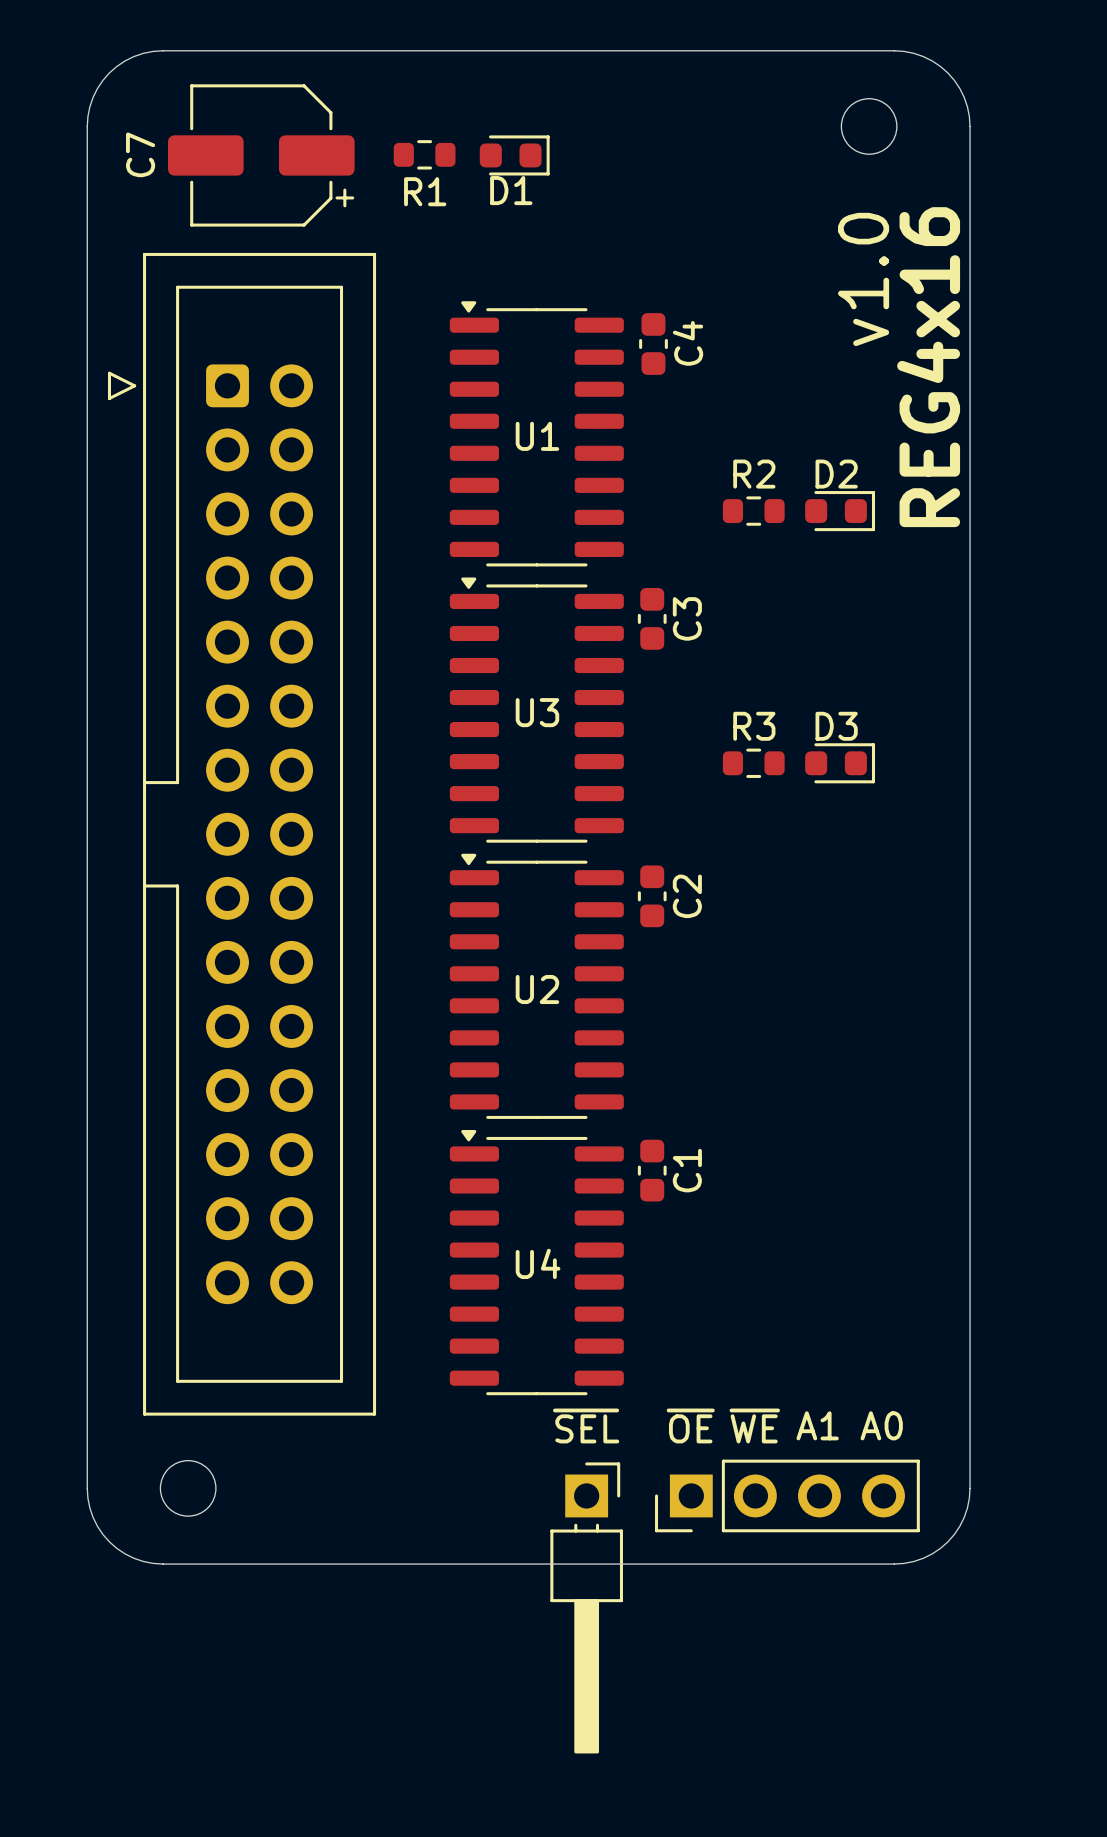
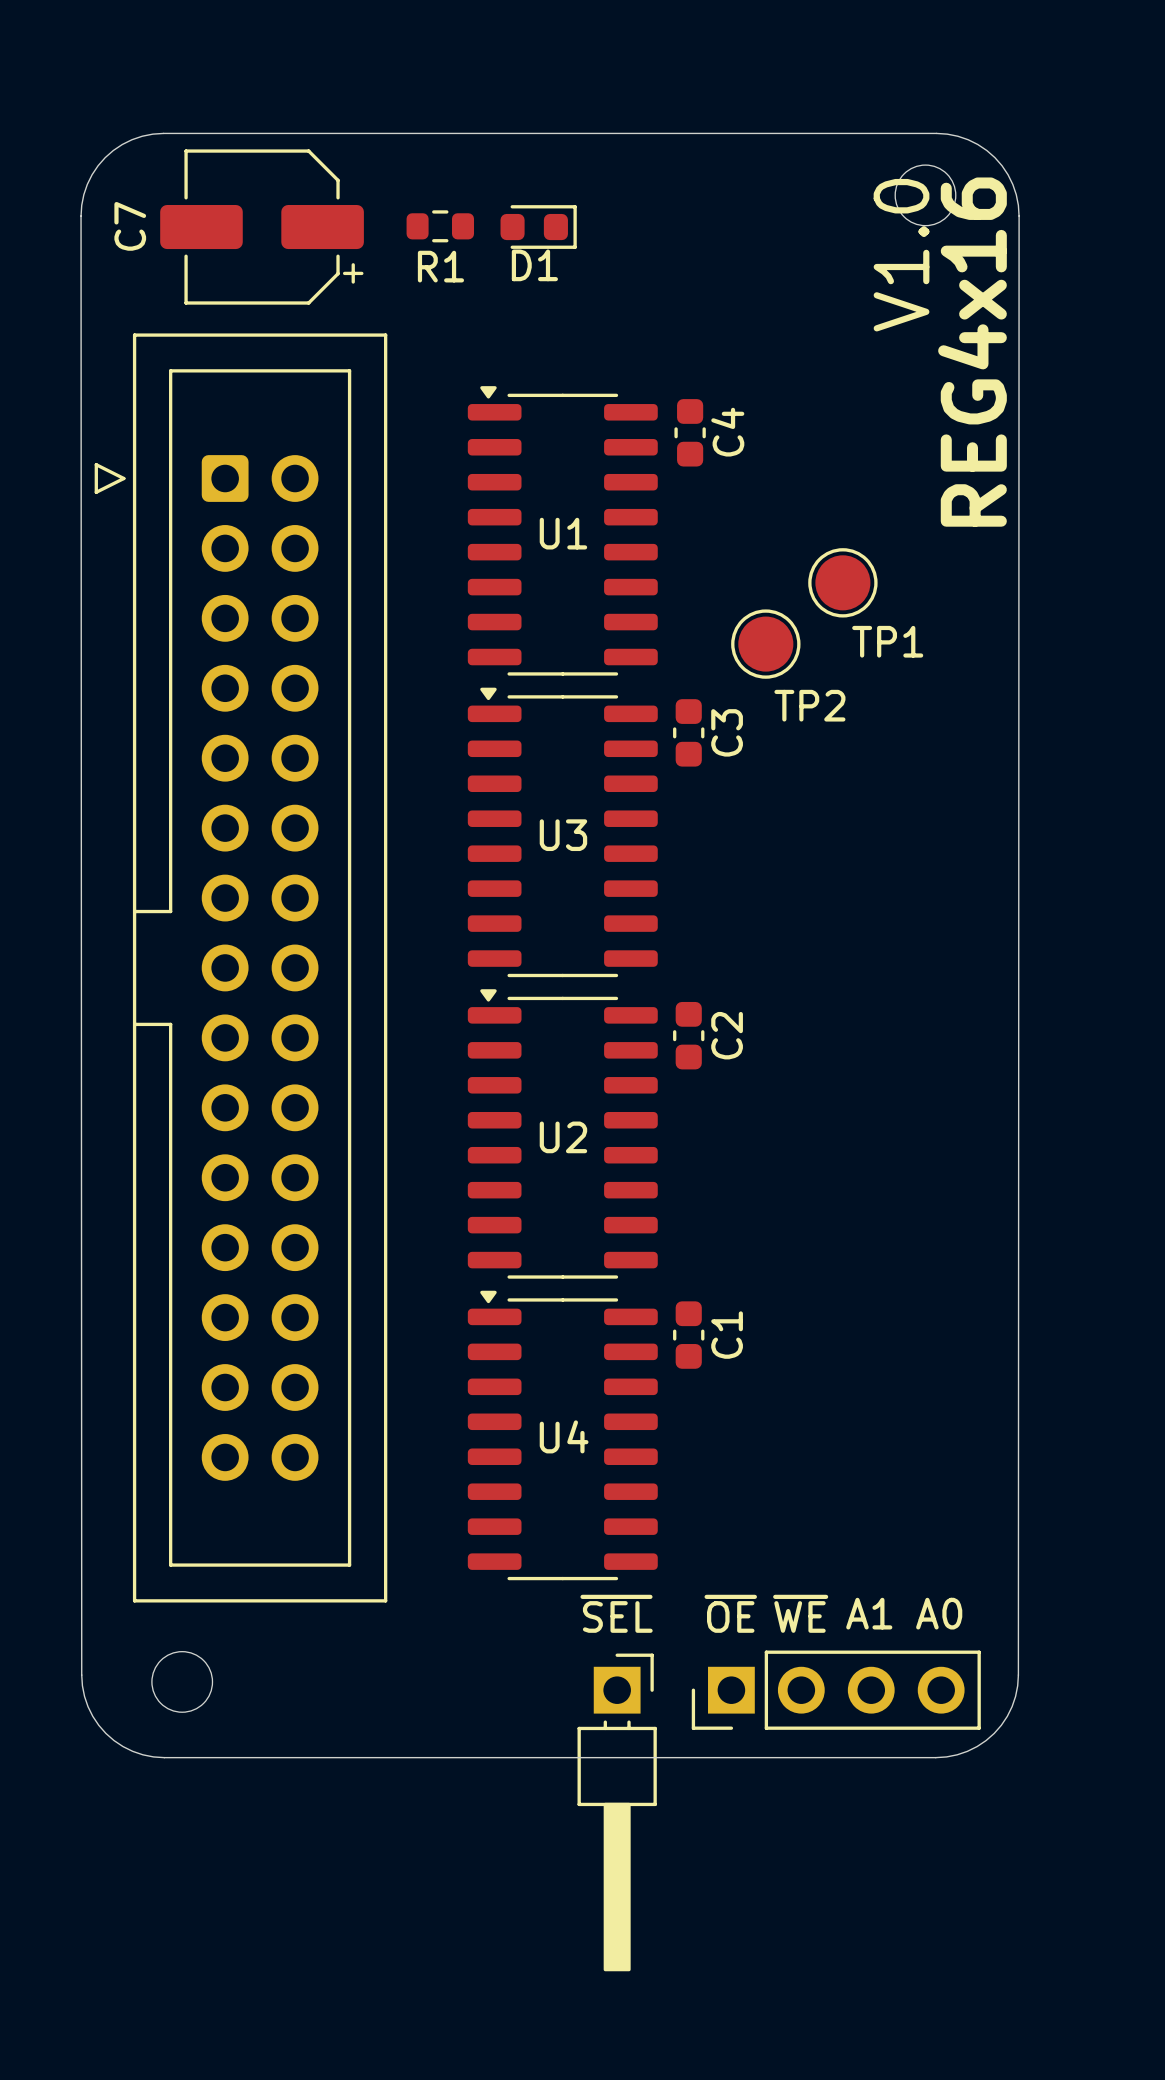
board edge: (162, 50) (894, 50) (913, 53) (932, 60) (947, 72) (959, 88) (967, 106) (970, 126) (970, 1488) (967, 1507) (959, 1526) (947, 1541) (932, 1553) (913, 1561) (894, 1564) (162, 1564) (143, 1561) (125, 1553) (109, 1541) (97, 1526) (89, 1507) (87, 1488) (87, 126) (93, 97) (109, 72) (133, 56) (162, 50) -> (163, 133) (132, 139) (105, 157) (87, 184) (81, 216) (81, 1675) (84, 1696) (92, 1716) (105, 1733) (123, 1746) (142, 1754) (164, 1757) (935, 1757) (957, 1754) (977, 1746) (994, 1733) (1007, 1716) (1015, 1696) (1018, 1675) (1019, 216) (1016, 194) (1008, 174) (994, 157) (977, 144) (957, 136) (936, 133) (163, 133)
text: v1.0 (863, 279) -> V1.0 (901, 255)
text position: REG4x16 (928, 367) -> REG4x16 (972, 352)
TP1: none -> (842, 582)
R2: (753, 511) -> none
D2: (840, 511) -> none
TP2: none -> (765, 644)
R3: (753, 763) -> none
D3: (840, 763) -> none

